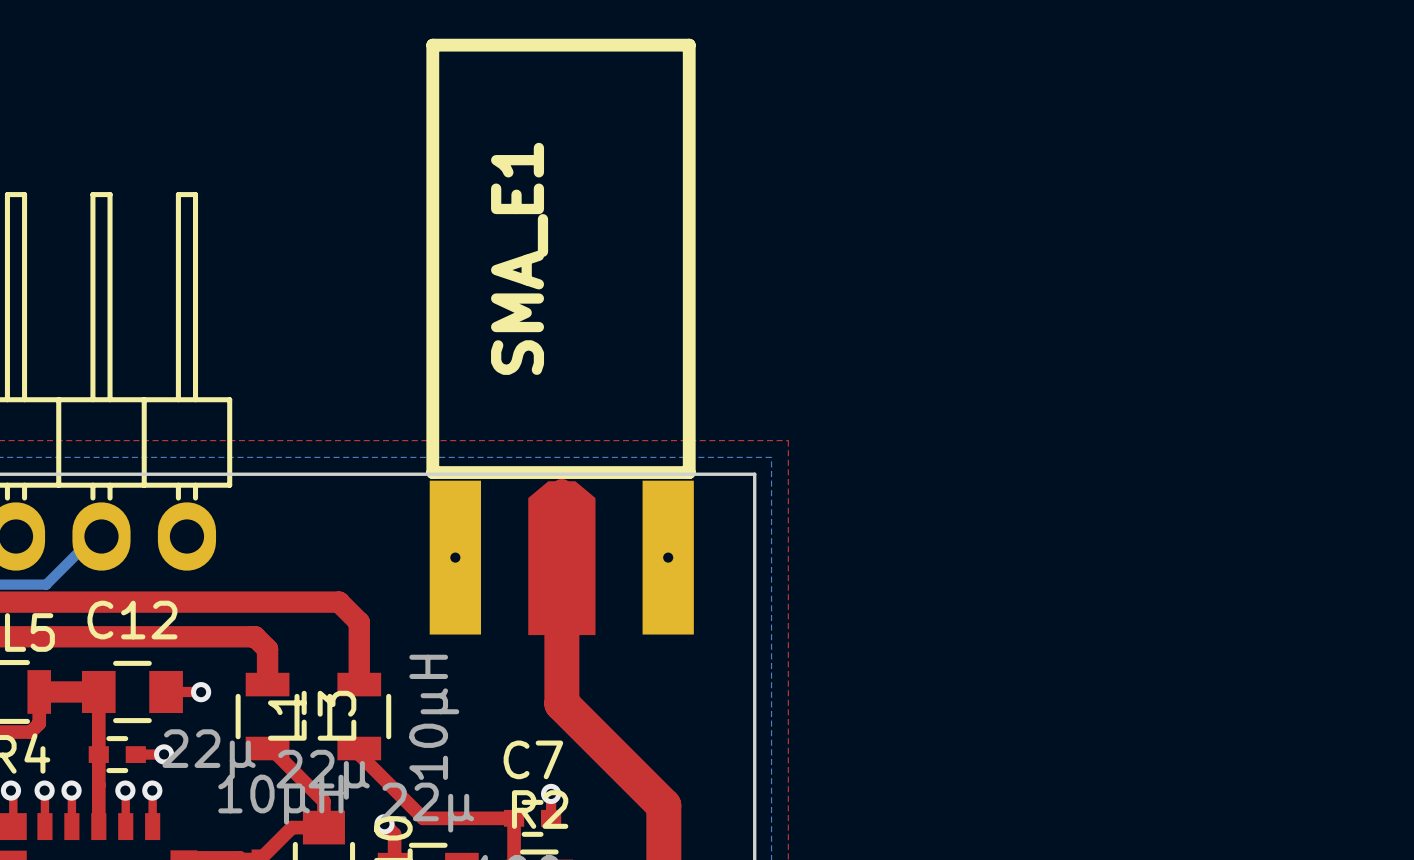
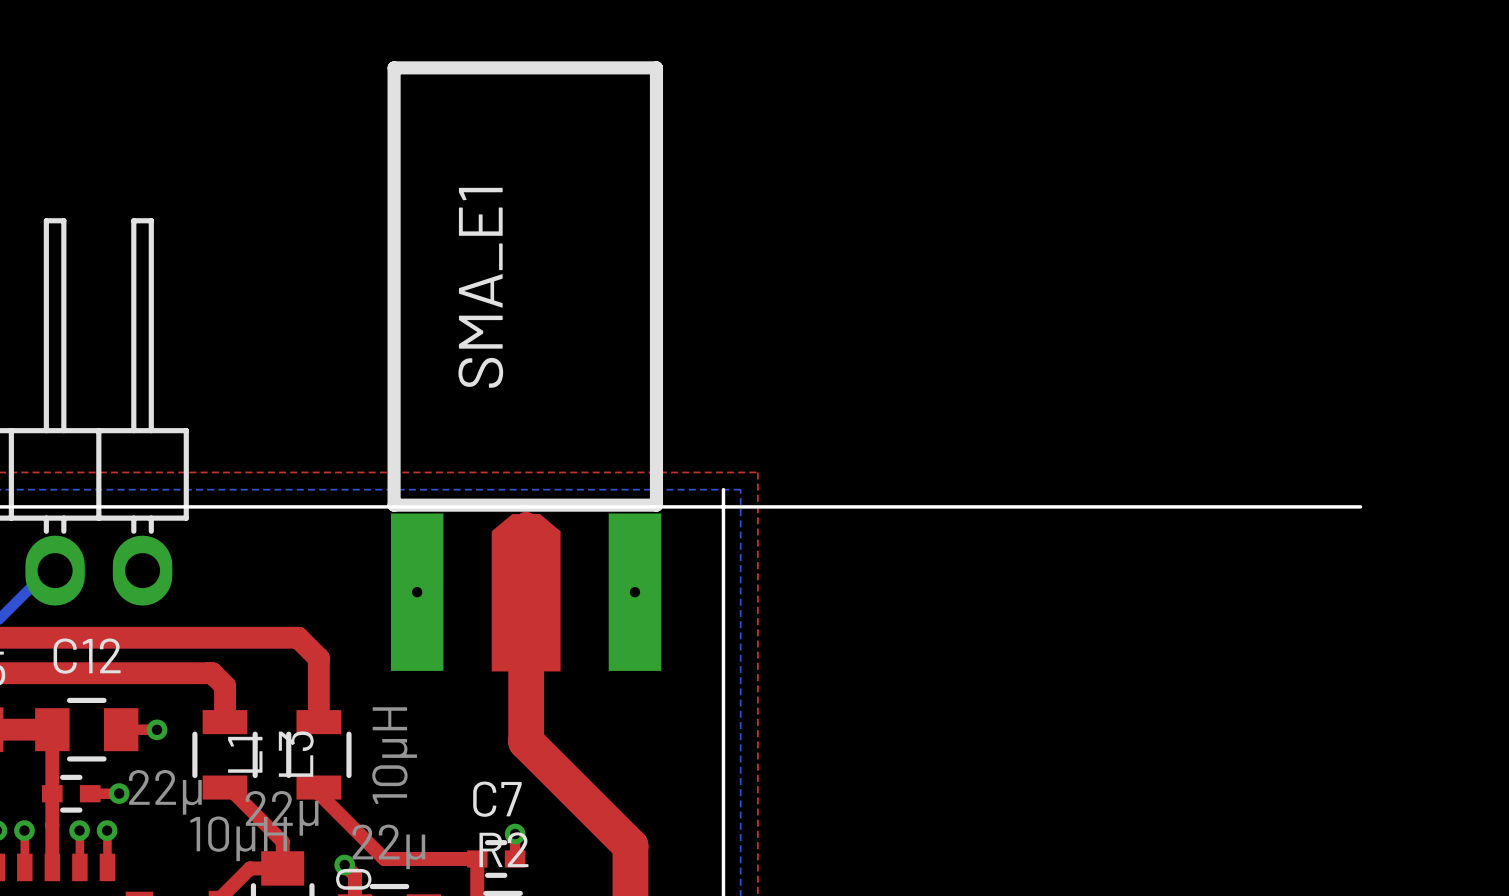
board edge: none -> (723, 489) (723, 506) (1360, 506)

